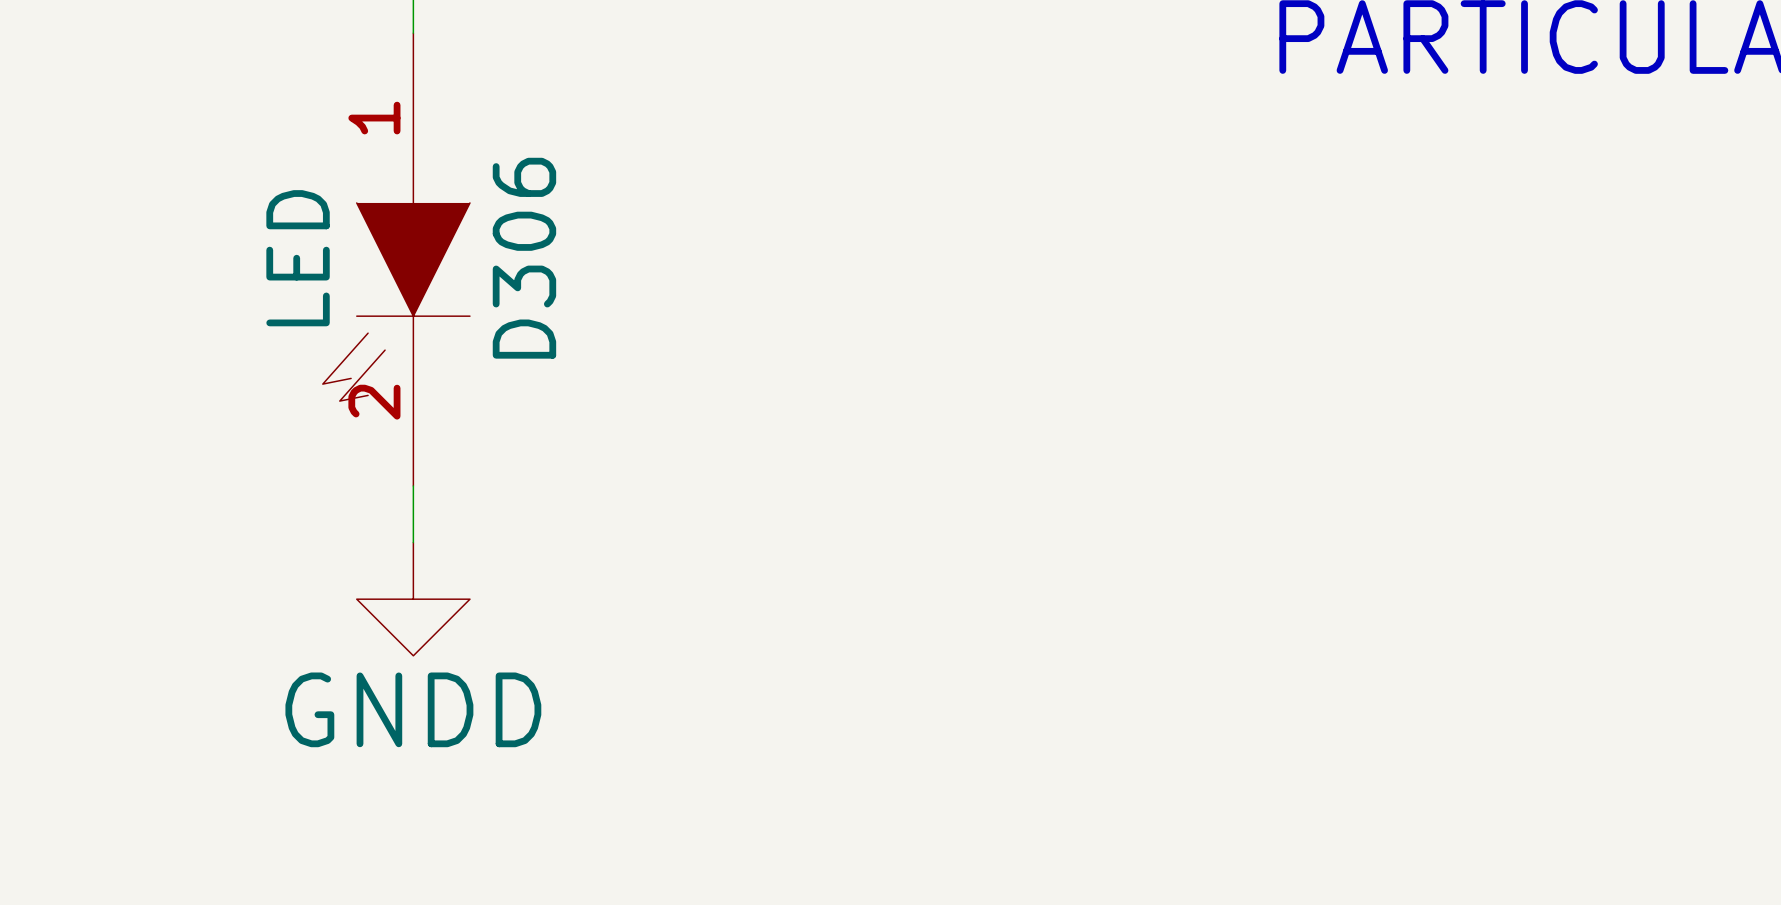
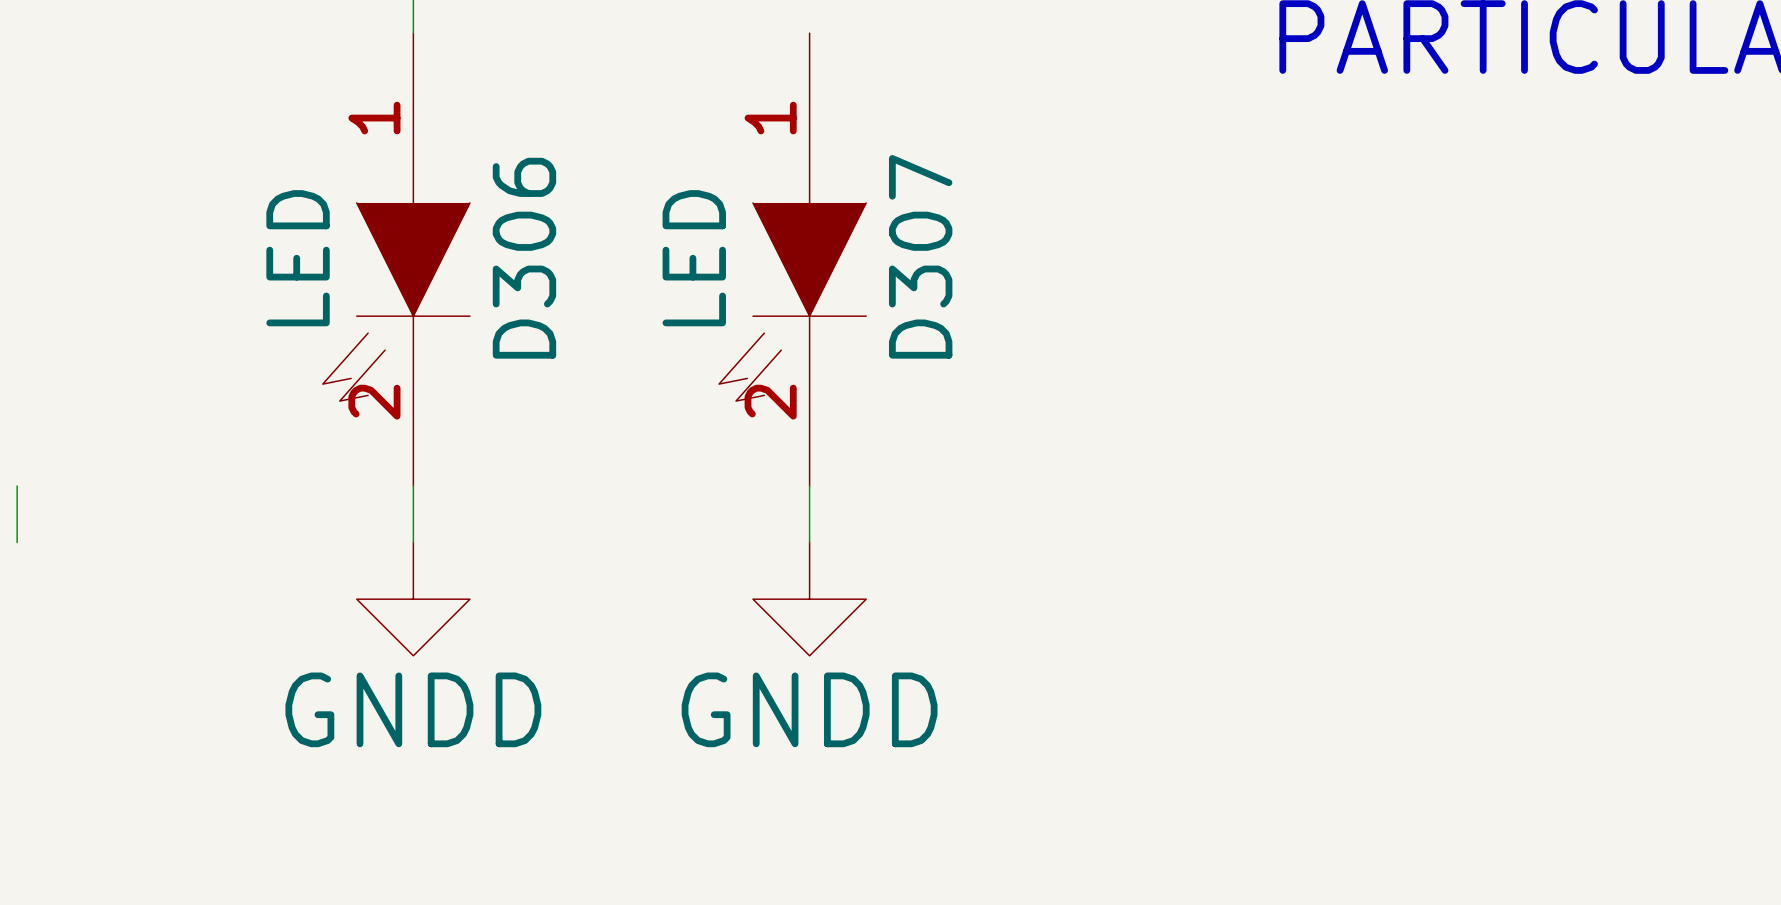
D307: none -> LED (792, 259)
wire: none -> (17, 485) (17, 542)
wire: none -> (809, 485) (809, 542)
power symbol: none -> GNDD (809, 599)

